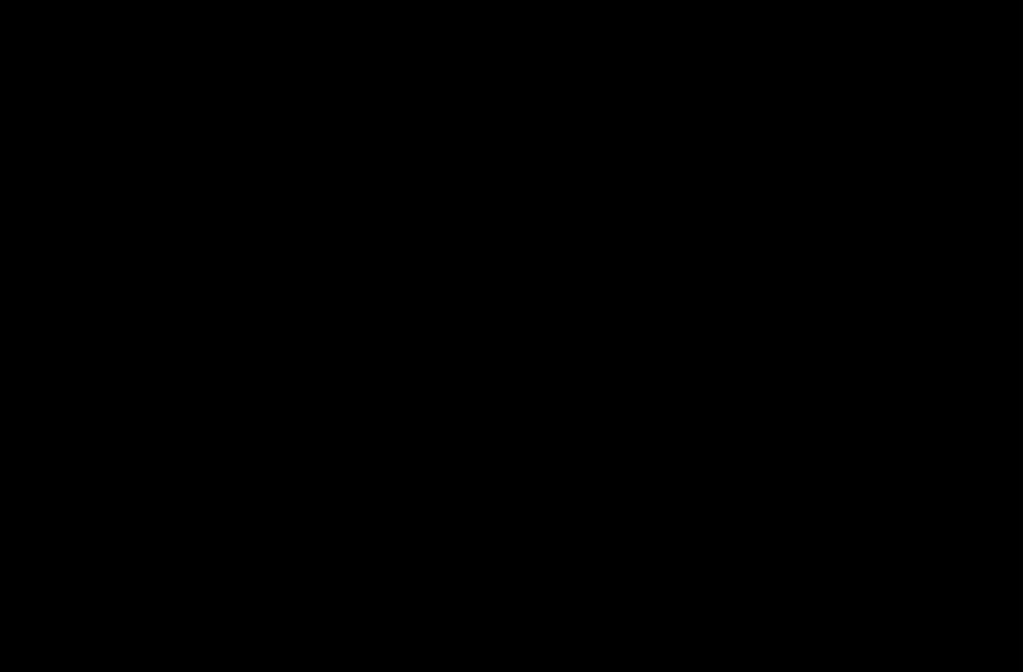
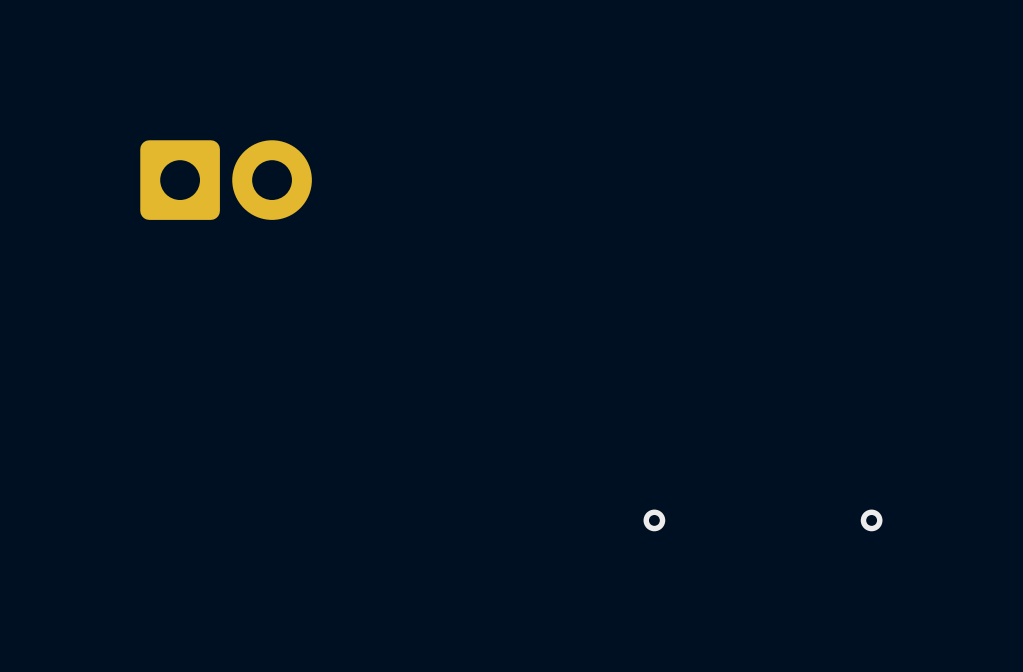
part: none -> (226, 180)
via: none -> (654, 520)
via: none -> (871, 520)

